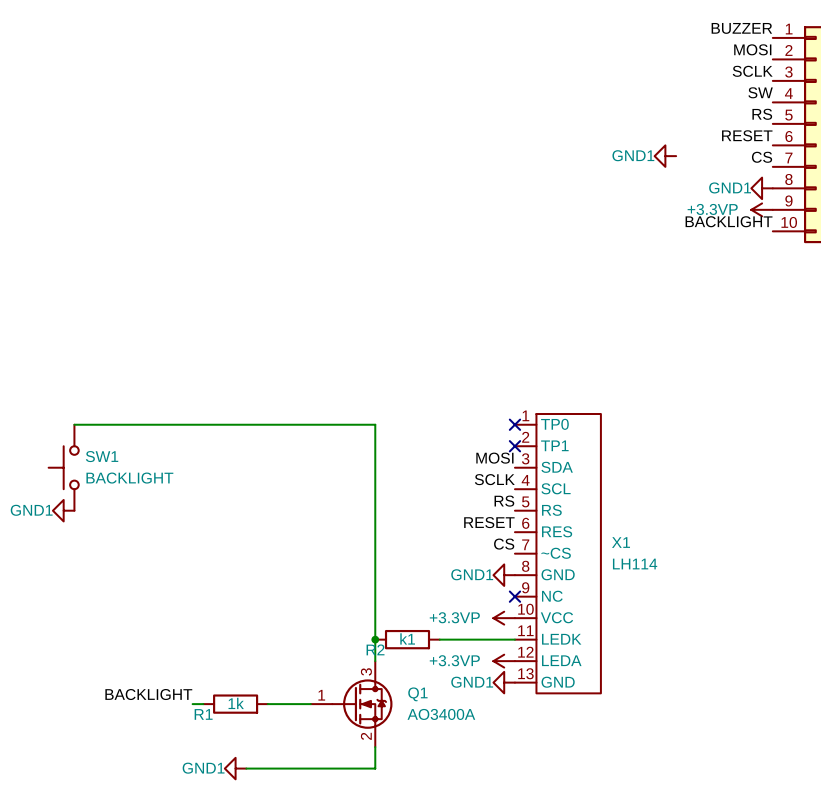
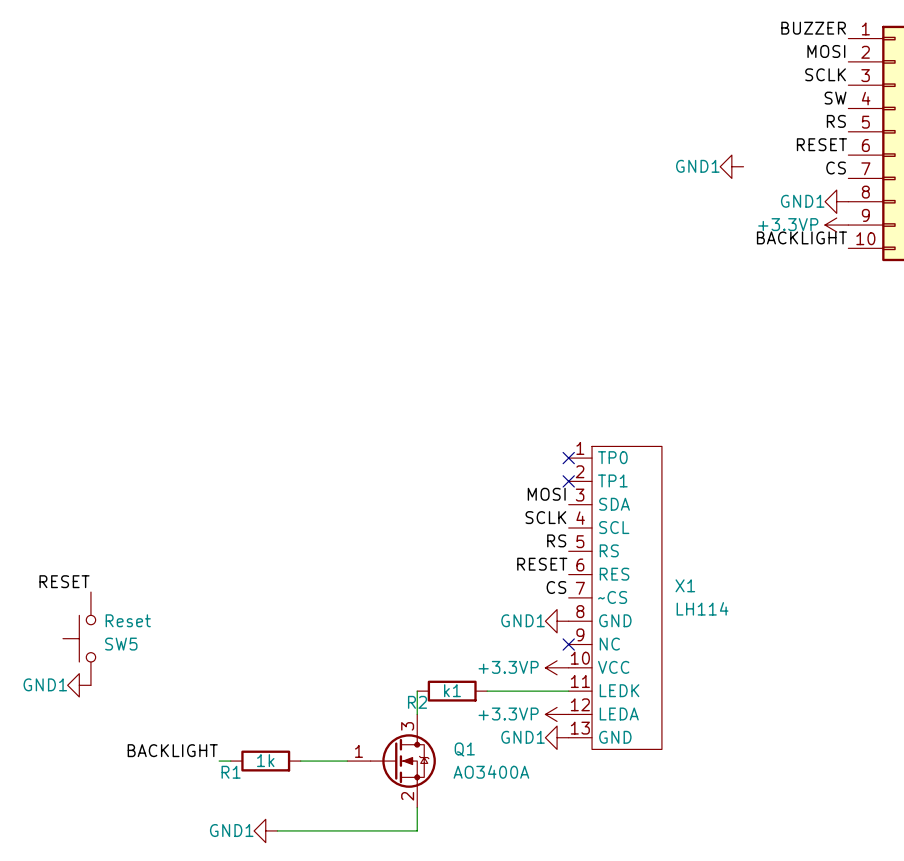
wire: (74, 424) (375, 424) (375, 639) -> none
SW1: BACKLIGHT (63, 467) -> none
power symbol position: GND1 (63, 510) -> GND1 (79, 685)
label: none -> RESET (64, 581)
SW5: none -> Reset (79, 638)
junction: (375, 639) -> none

